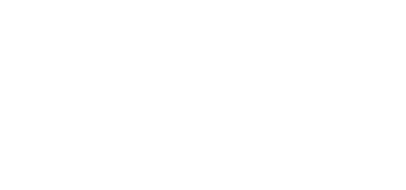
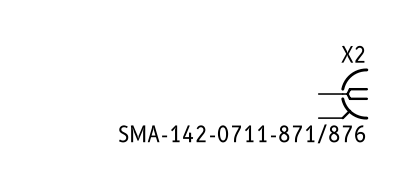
X2: none -> SMA-142-0711-871/876 (343, 94)

